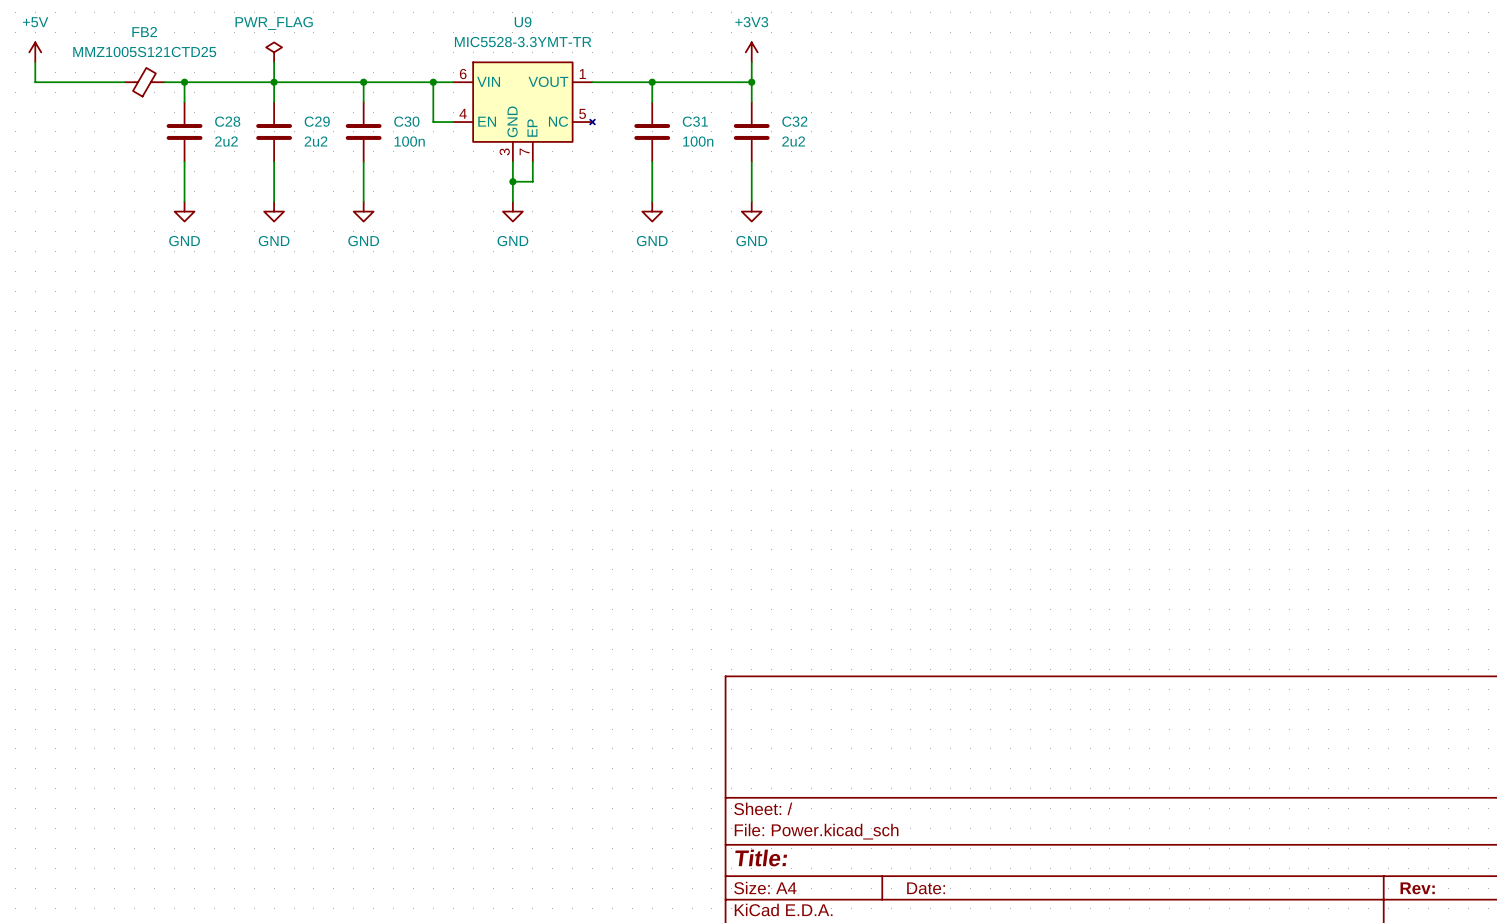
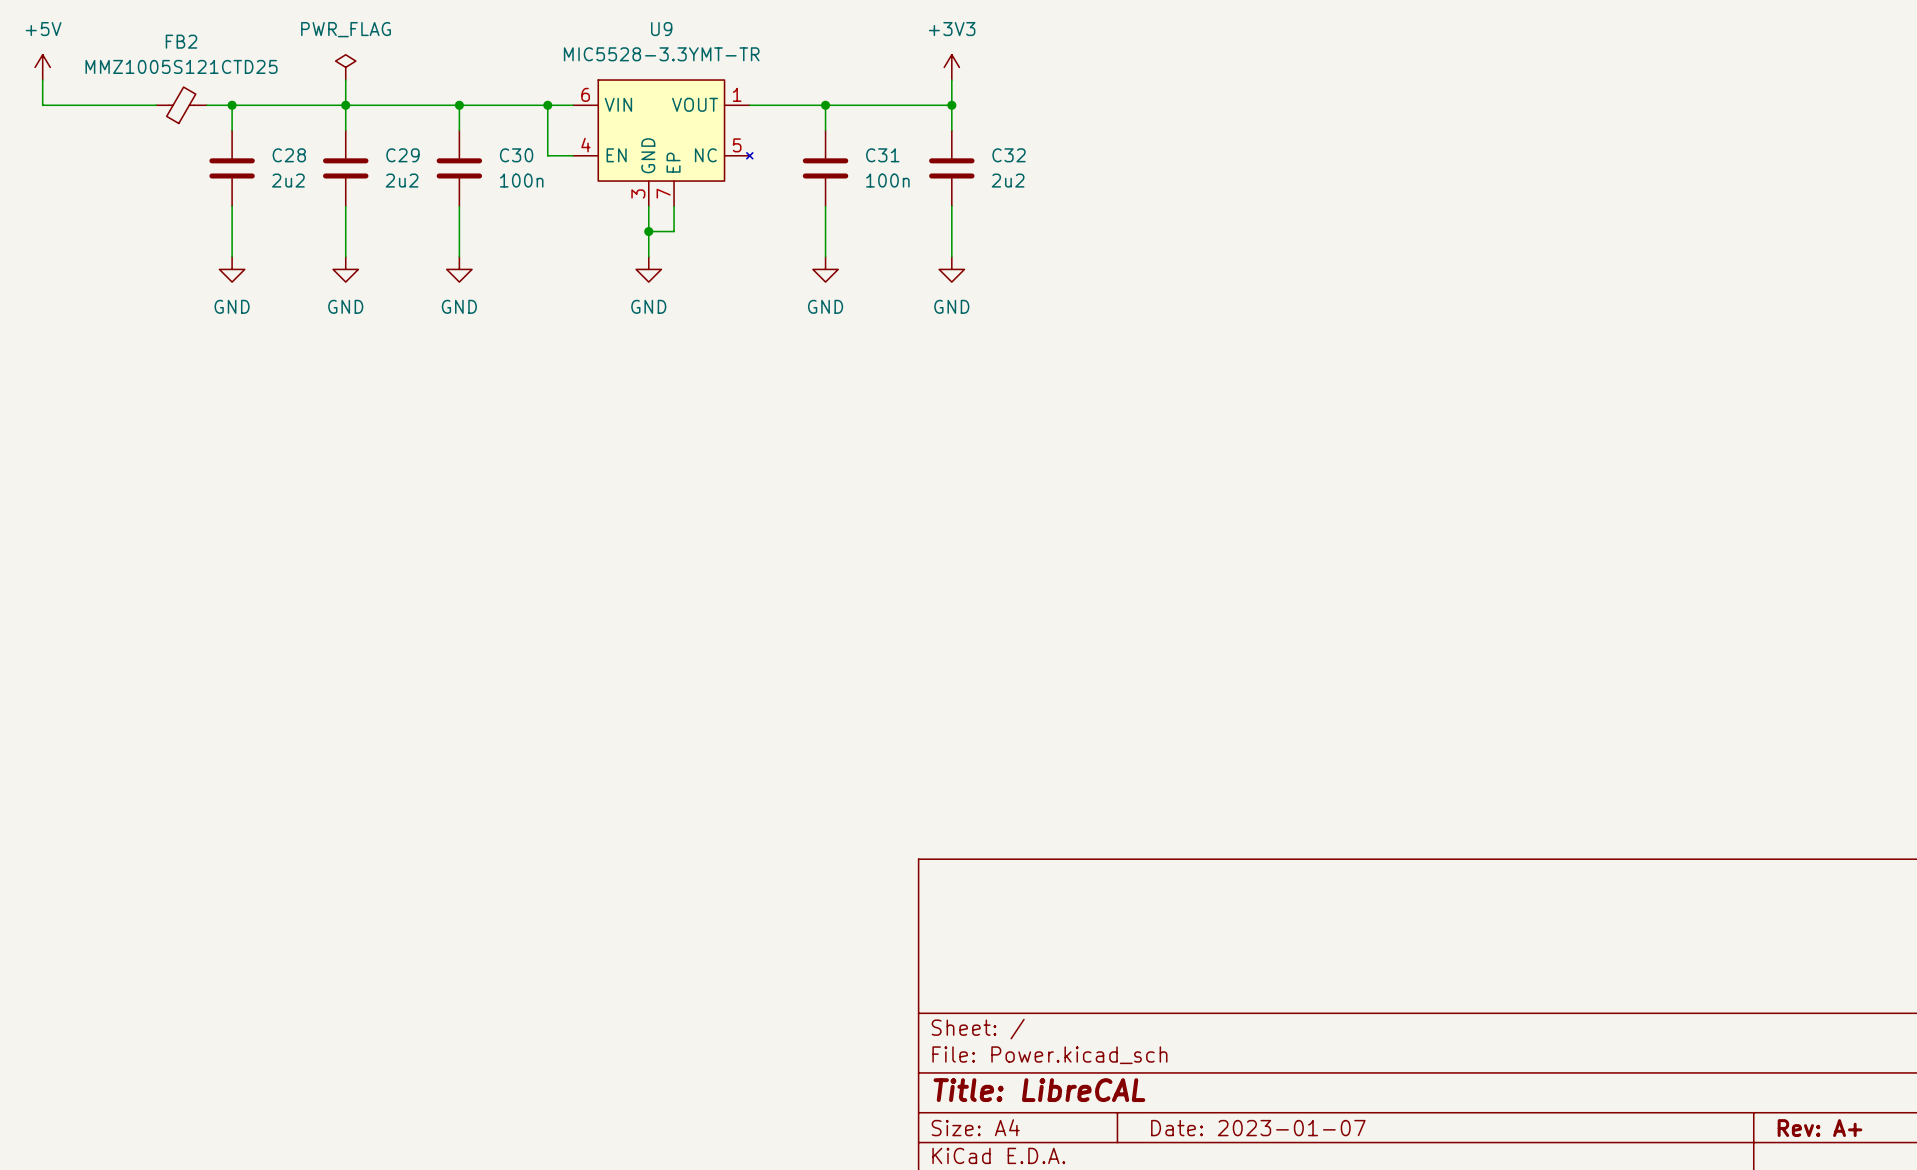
title block: Title: (761, 858) -> Title: LibreCAL (1039, 1090)
title block: Date: (926, 888) -> Date: 2023-01-07 (1258, 1128)
title block: Rev: (1417, 888) -> Rev: A+ (1819, 1128)

